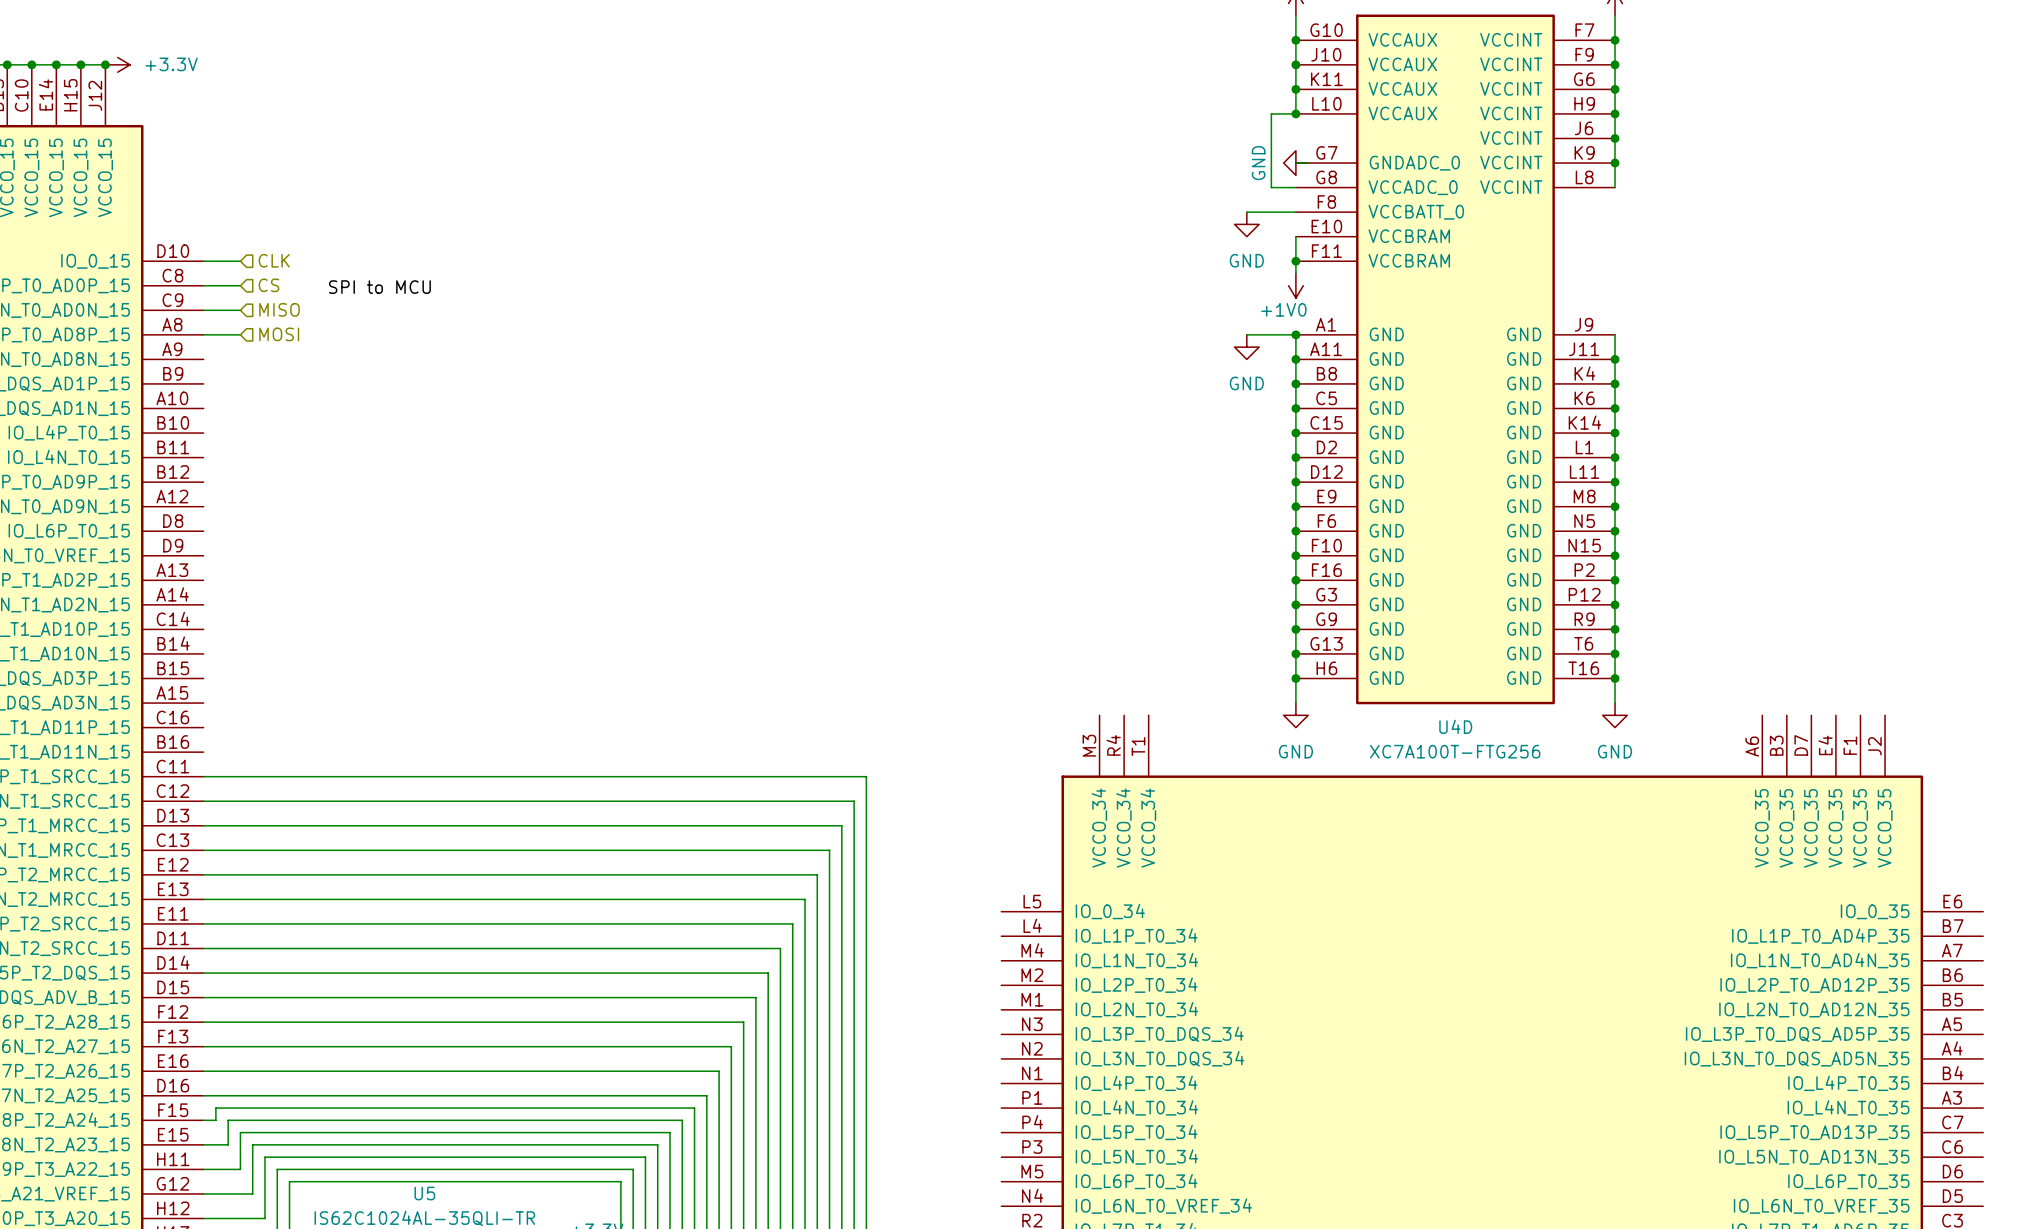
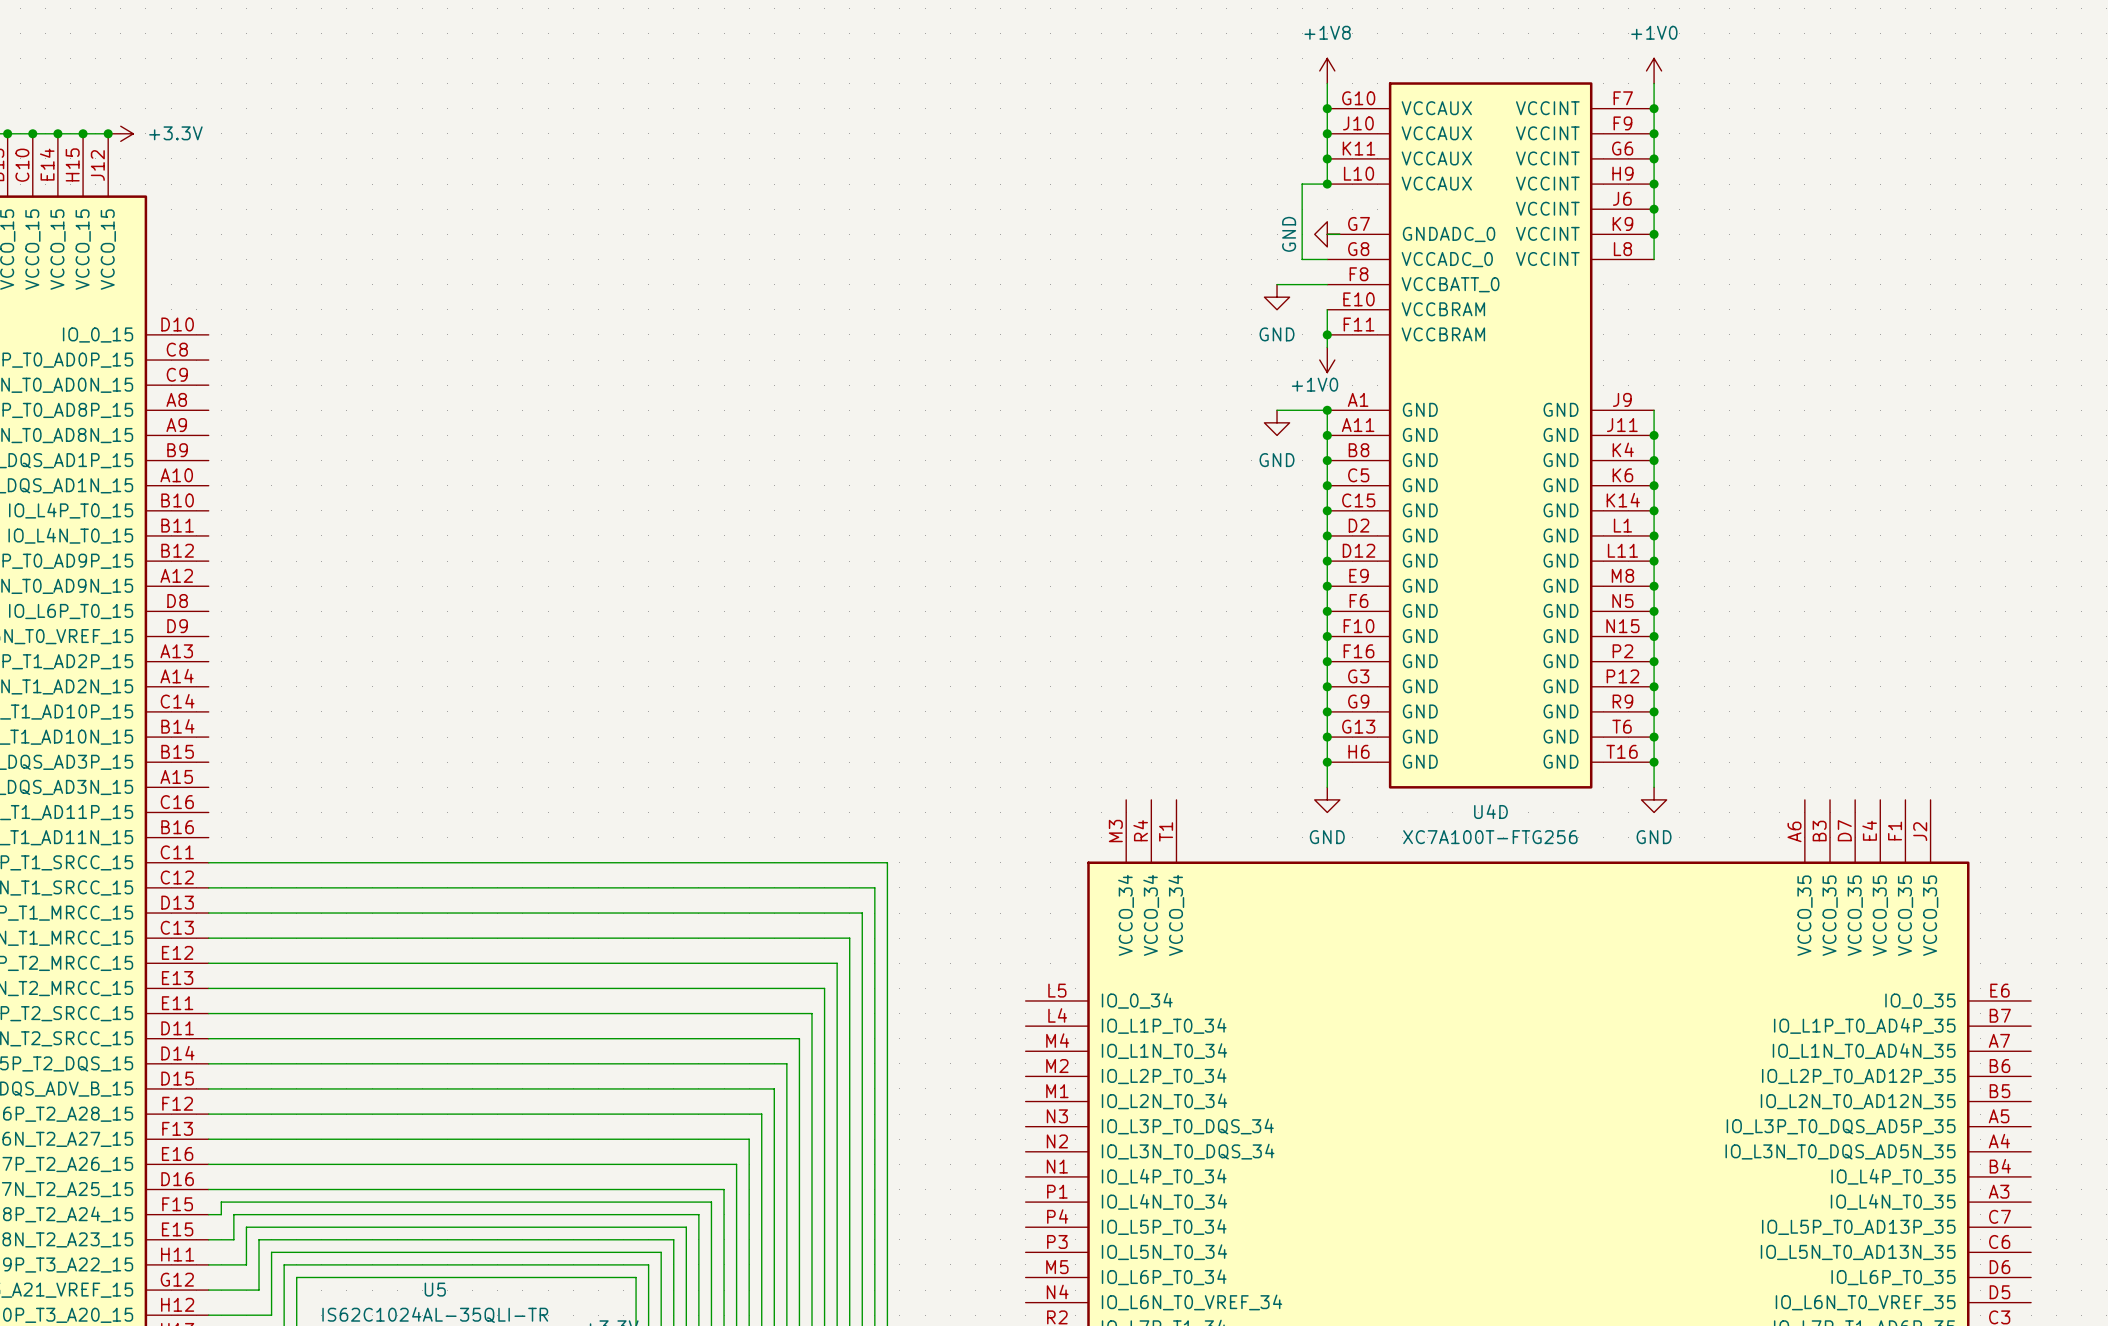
hierarchical label: CLK (274, 260) -> none
wire: (203, 261) (240, 261) -> none
wire: (203, 285) (240, 285) -> none
hierarchical label: CS (268, 285) -> none
label: SPI to MCU (379, 287) -> none
hierarchical label: MISO (279, 309) -> none
wire: (203, 310) (240, 310) -> none
wire: (203, 334) (240, 334) -> none
hierarchical label: MOSI (279, 334) -> none

